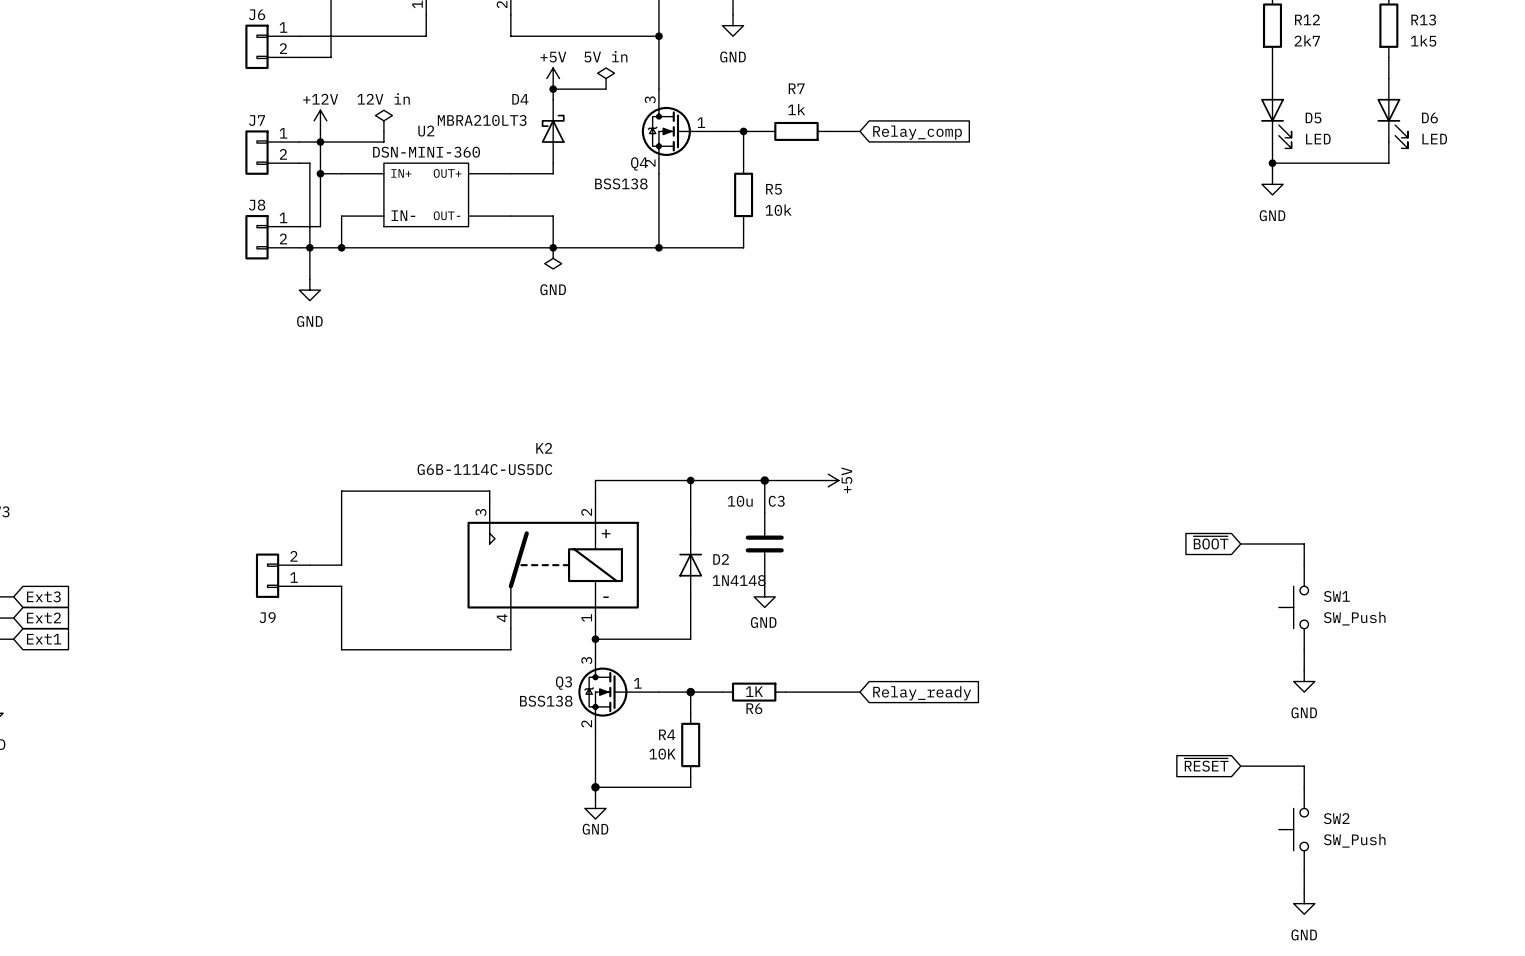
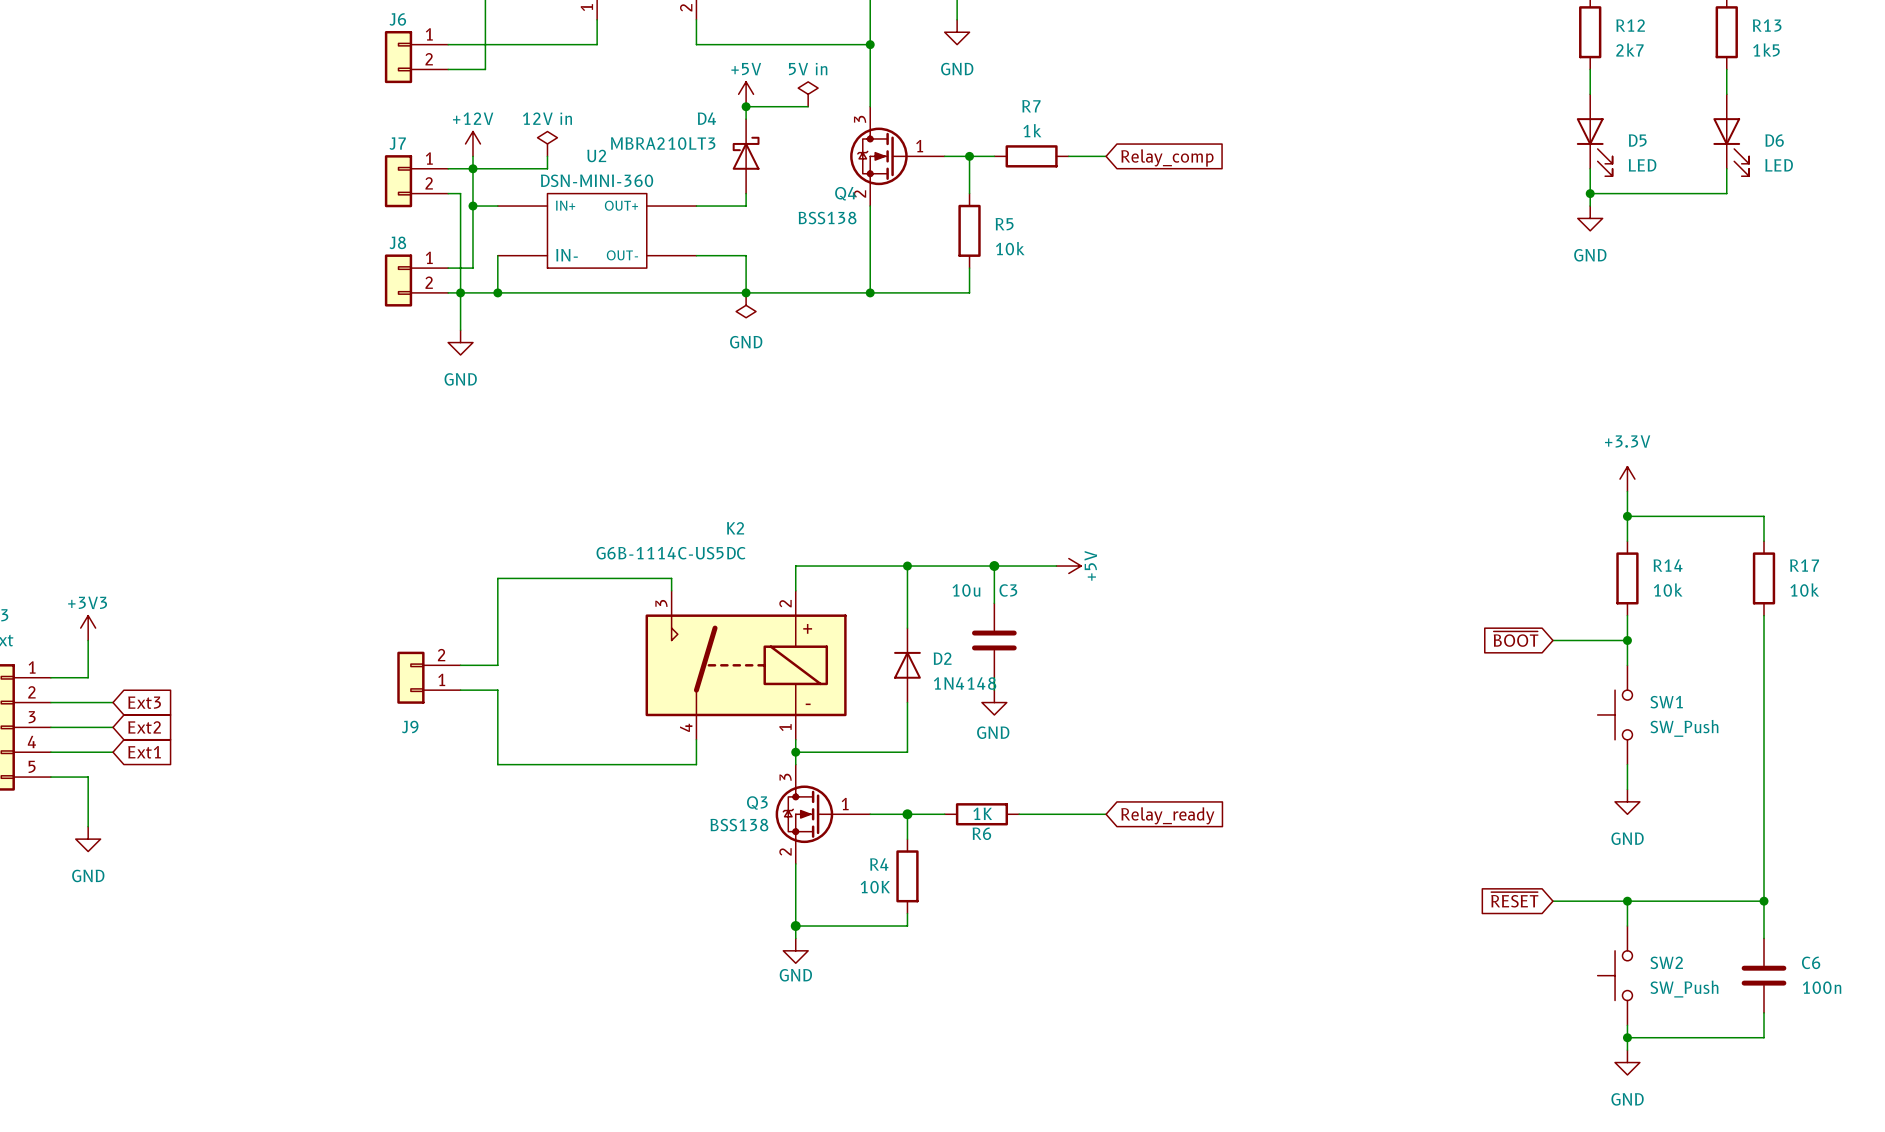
power symbol: none -> +3.3V (1627, 479)
wire: none -> (1627, 491) (1627, 541)
wire: none -> (1627, 516) (1764, 516) (1764, 541)
junction: none -> (1627, 516)
R14: none -> 10k (1627, 578)
R17: none -> 10k (1764, 578)
wire: none -> (1627, 615) (1627, 640)
wire: none -> (1764, 615) (1764, 938)
junction: none -> (1627, 640)
wire: none -> (1627, 901) (1764, 901)
junction: none -> (1627, 901)
junction: none -> (1764, 901)
C6: none -> 100n (1764, 975)
wire: none -> (1764, 1012) (1764, 1037) (1627, 1037)
junction: none -> (1627, 1037)

